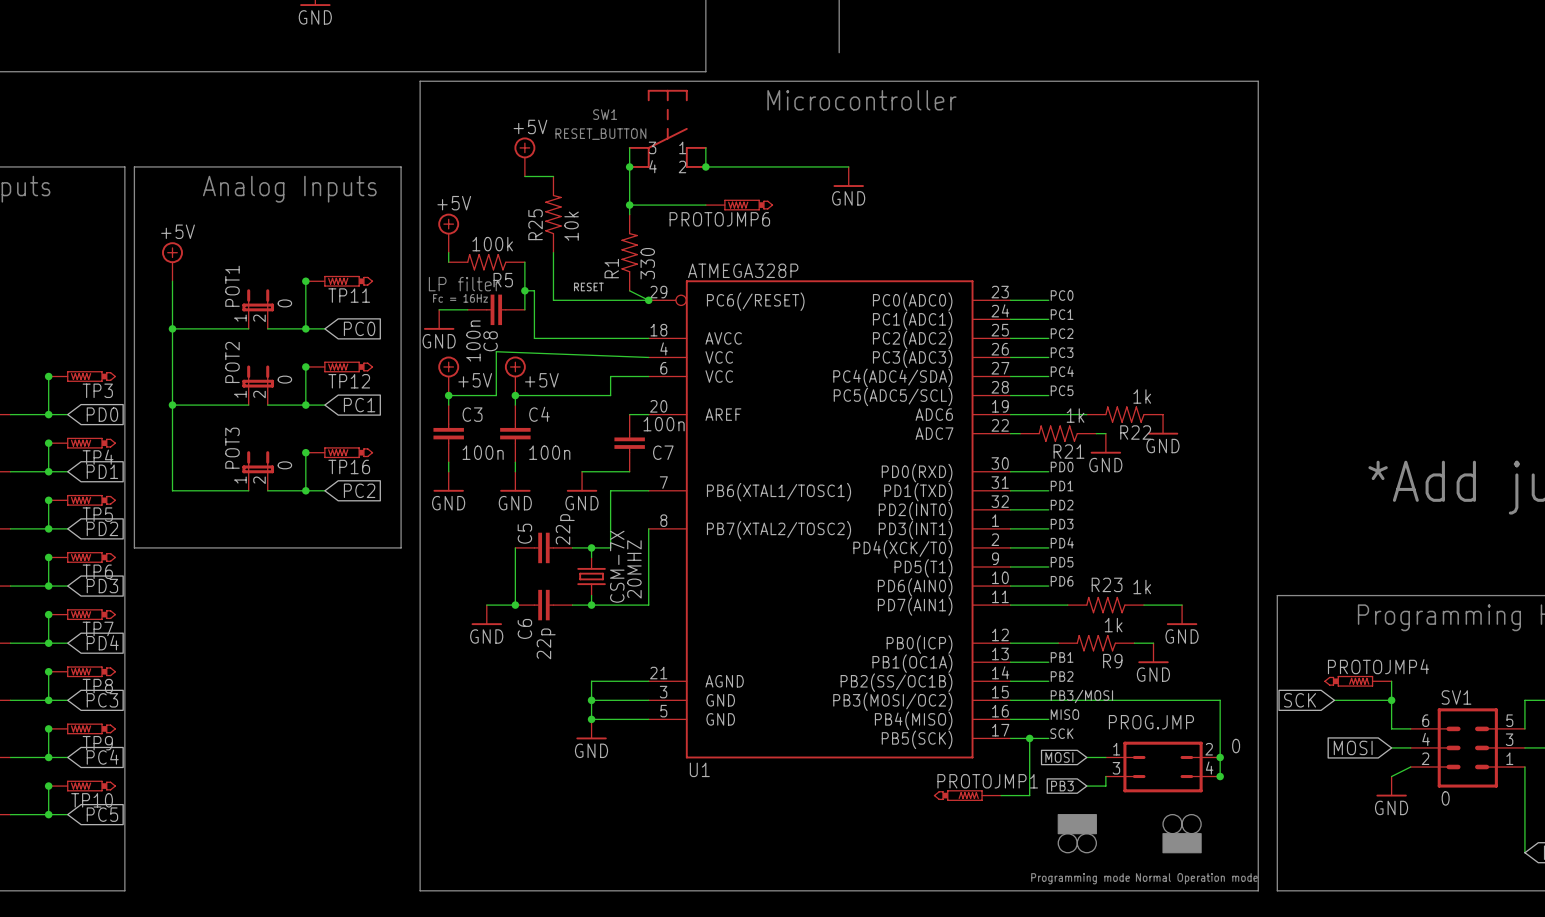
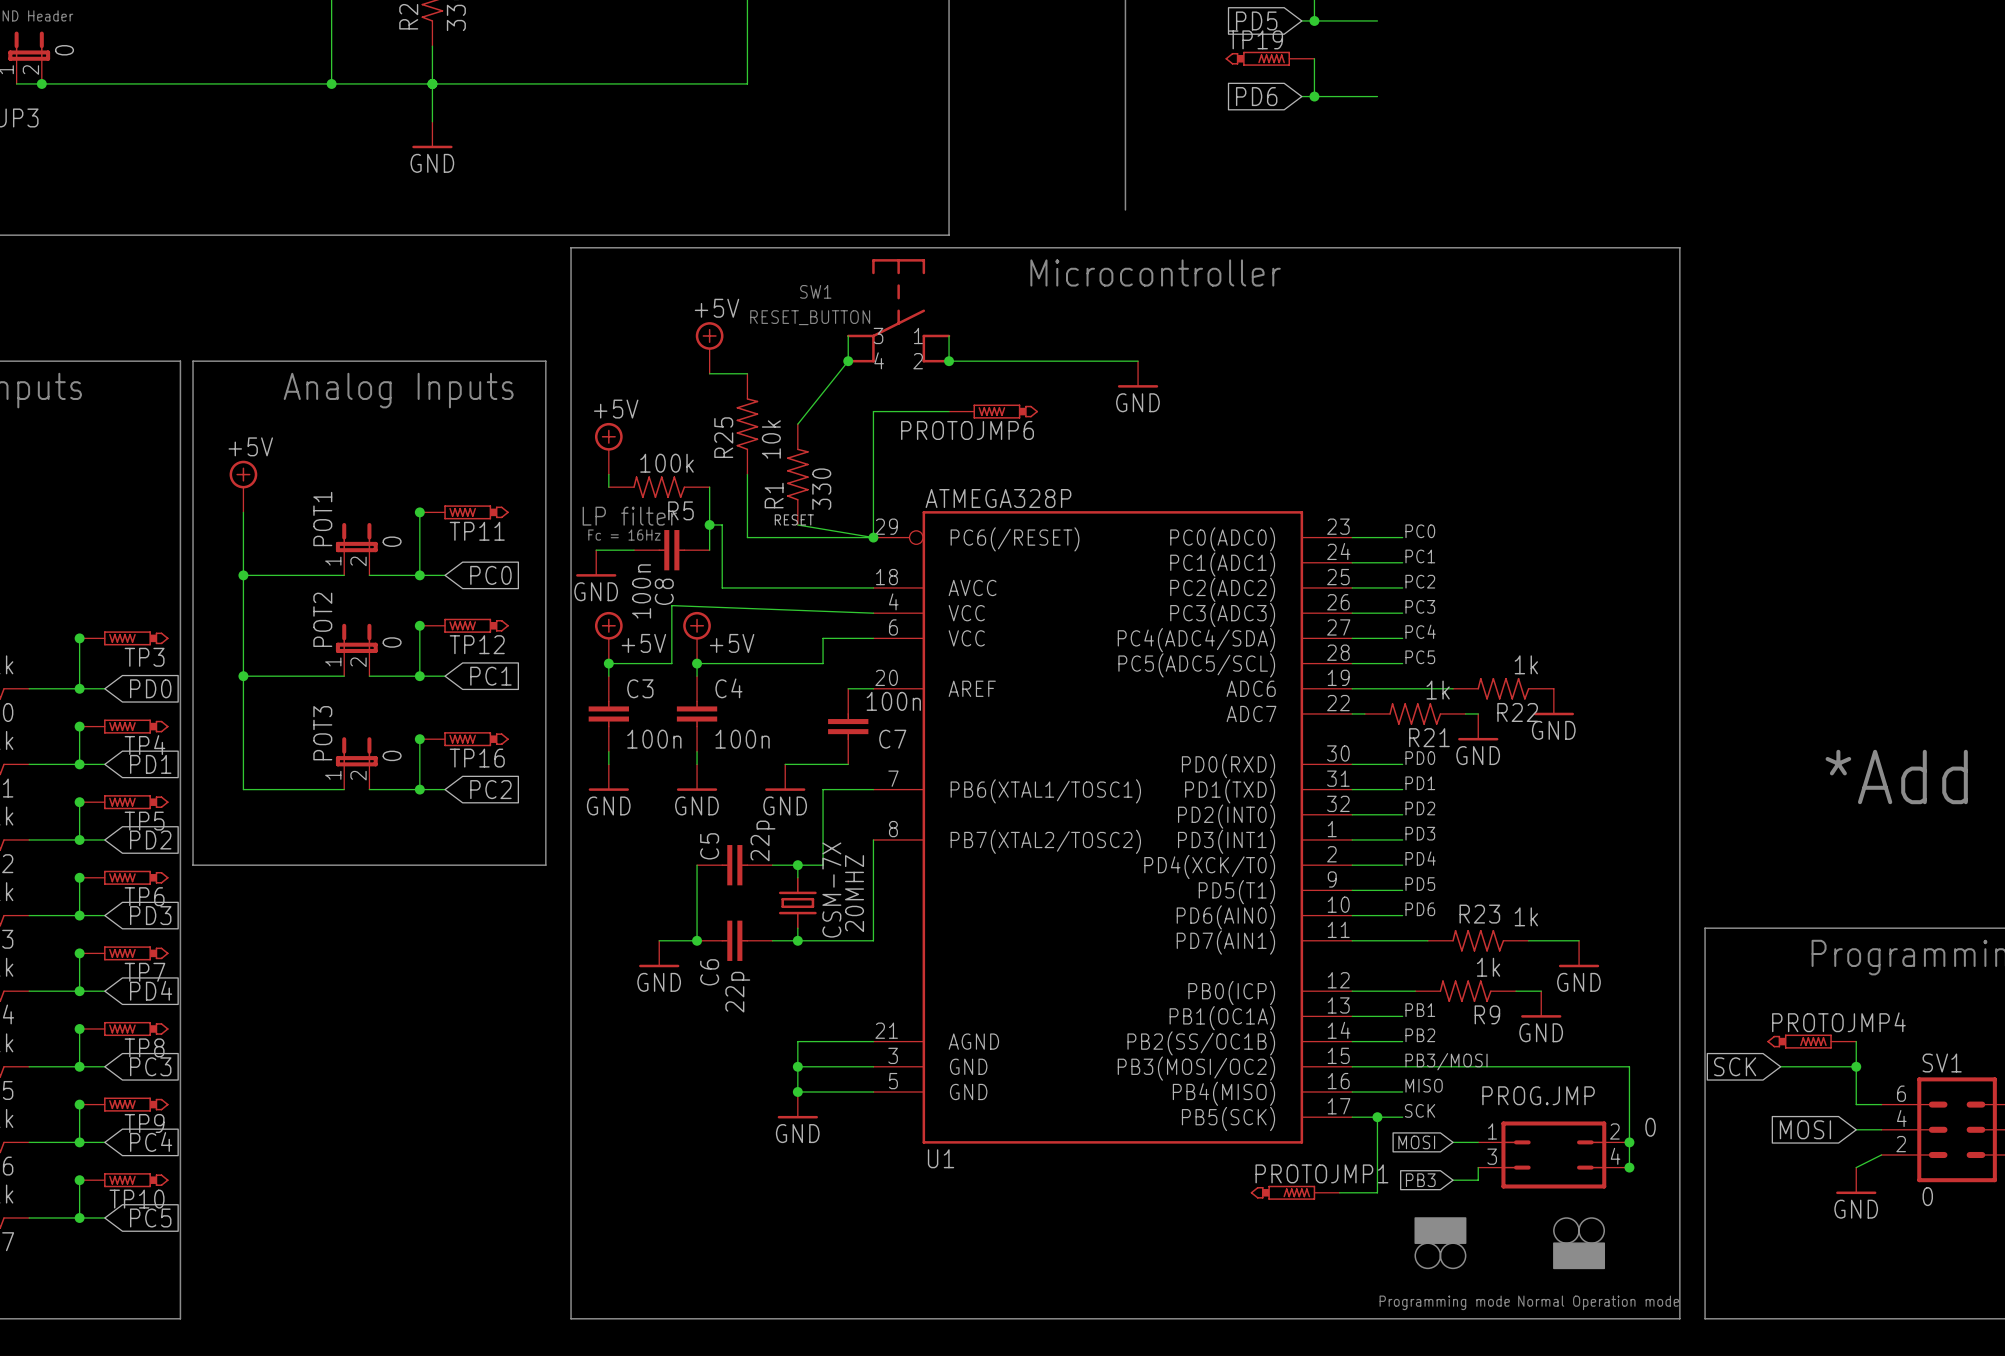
wire: (629, 166) (629, 214) -> (848, 361) (797, 424)
wire: (629, 205) (648, 205) -> (797, 524) (873, 537) (873, 411)
junction: (629, 205) -> none
R1 position: (629, 252) -> (797, 474)
wire: (629, 290) (648, 300) -> none

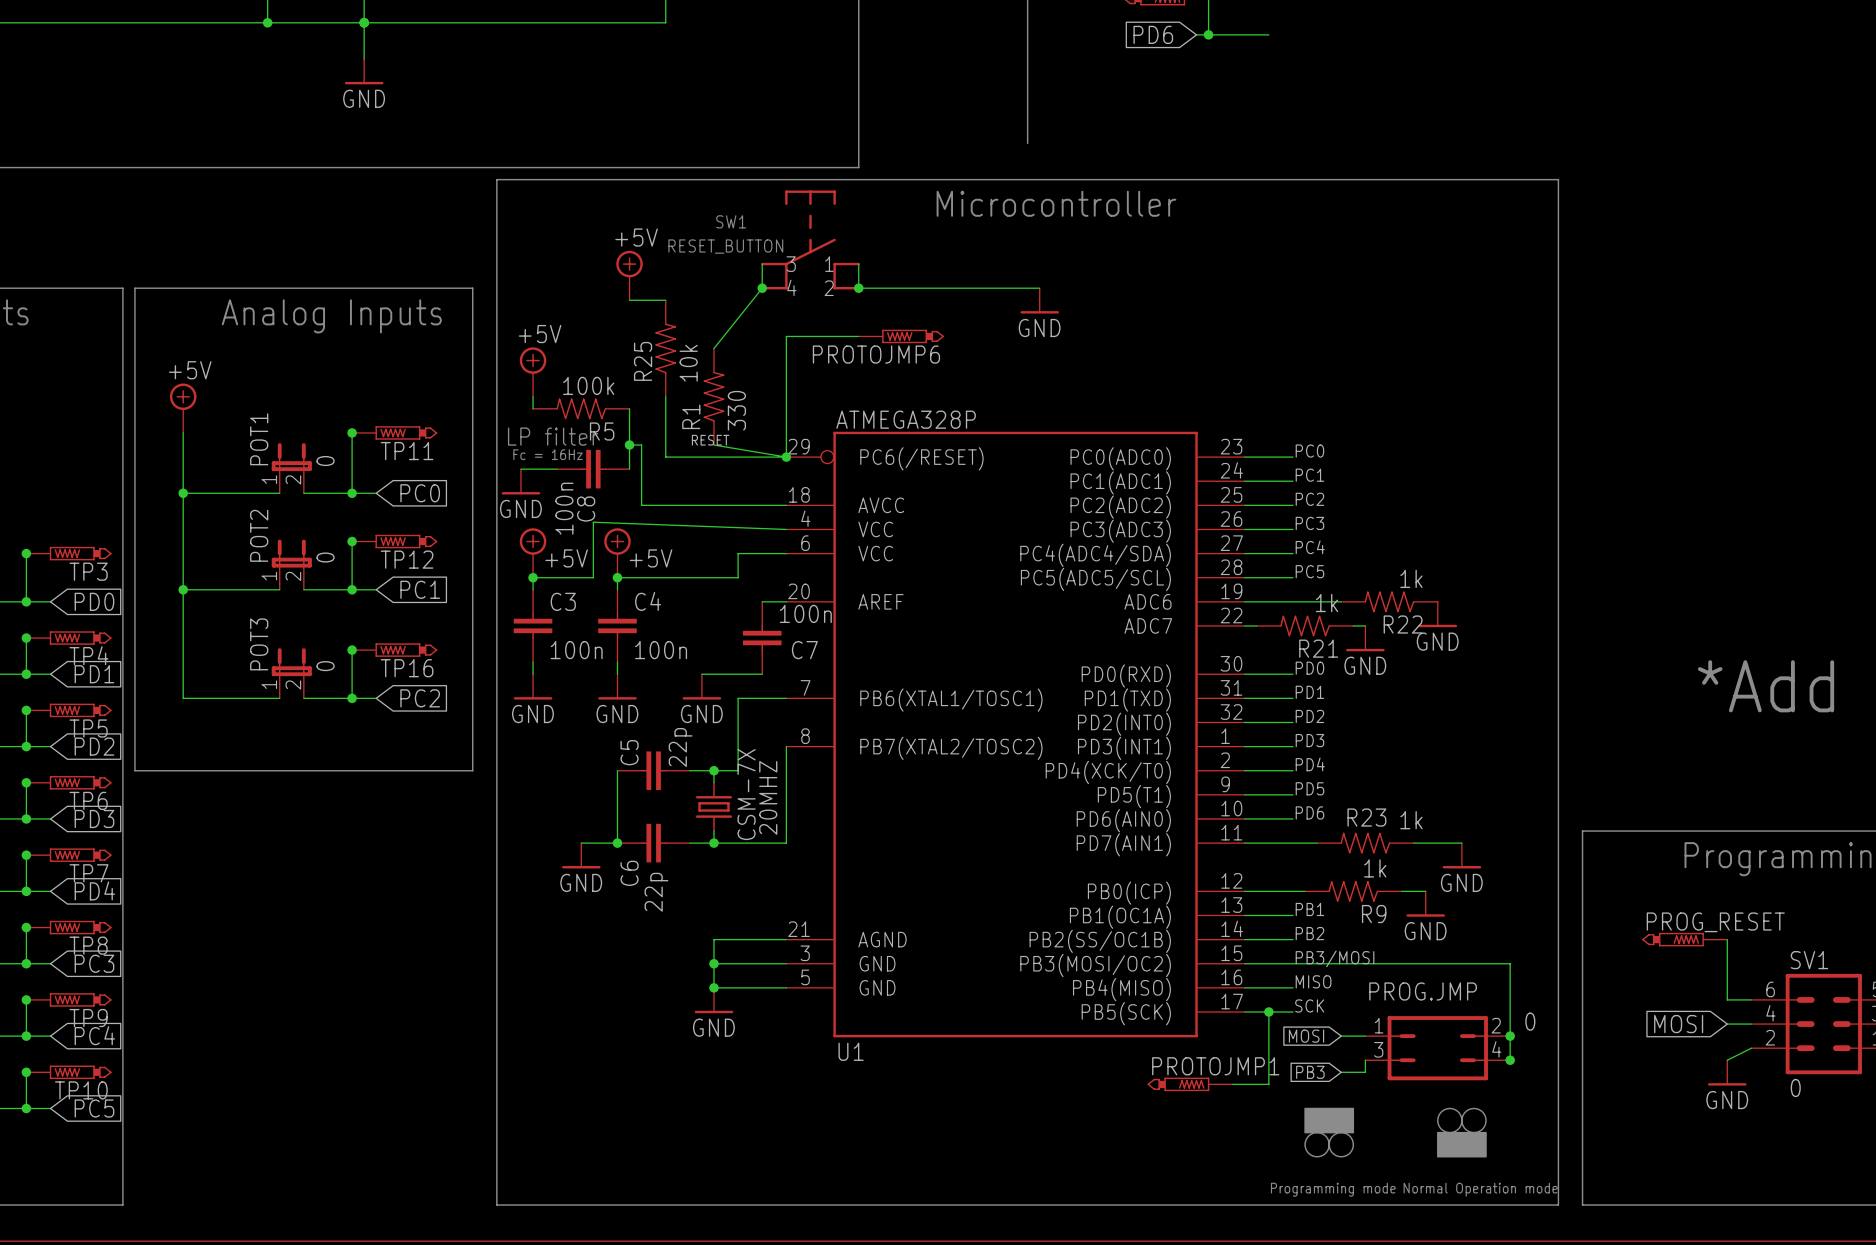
PROTOJMP4 name: PROTOJMP4 (1838, 1022) -> PROG_RESET (1715, 922)
global label: SCK (1735, 1066) -> none
wire: (1780, 1066) (1856, 1066) -> none
junction: (1856, 1066) -> none

